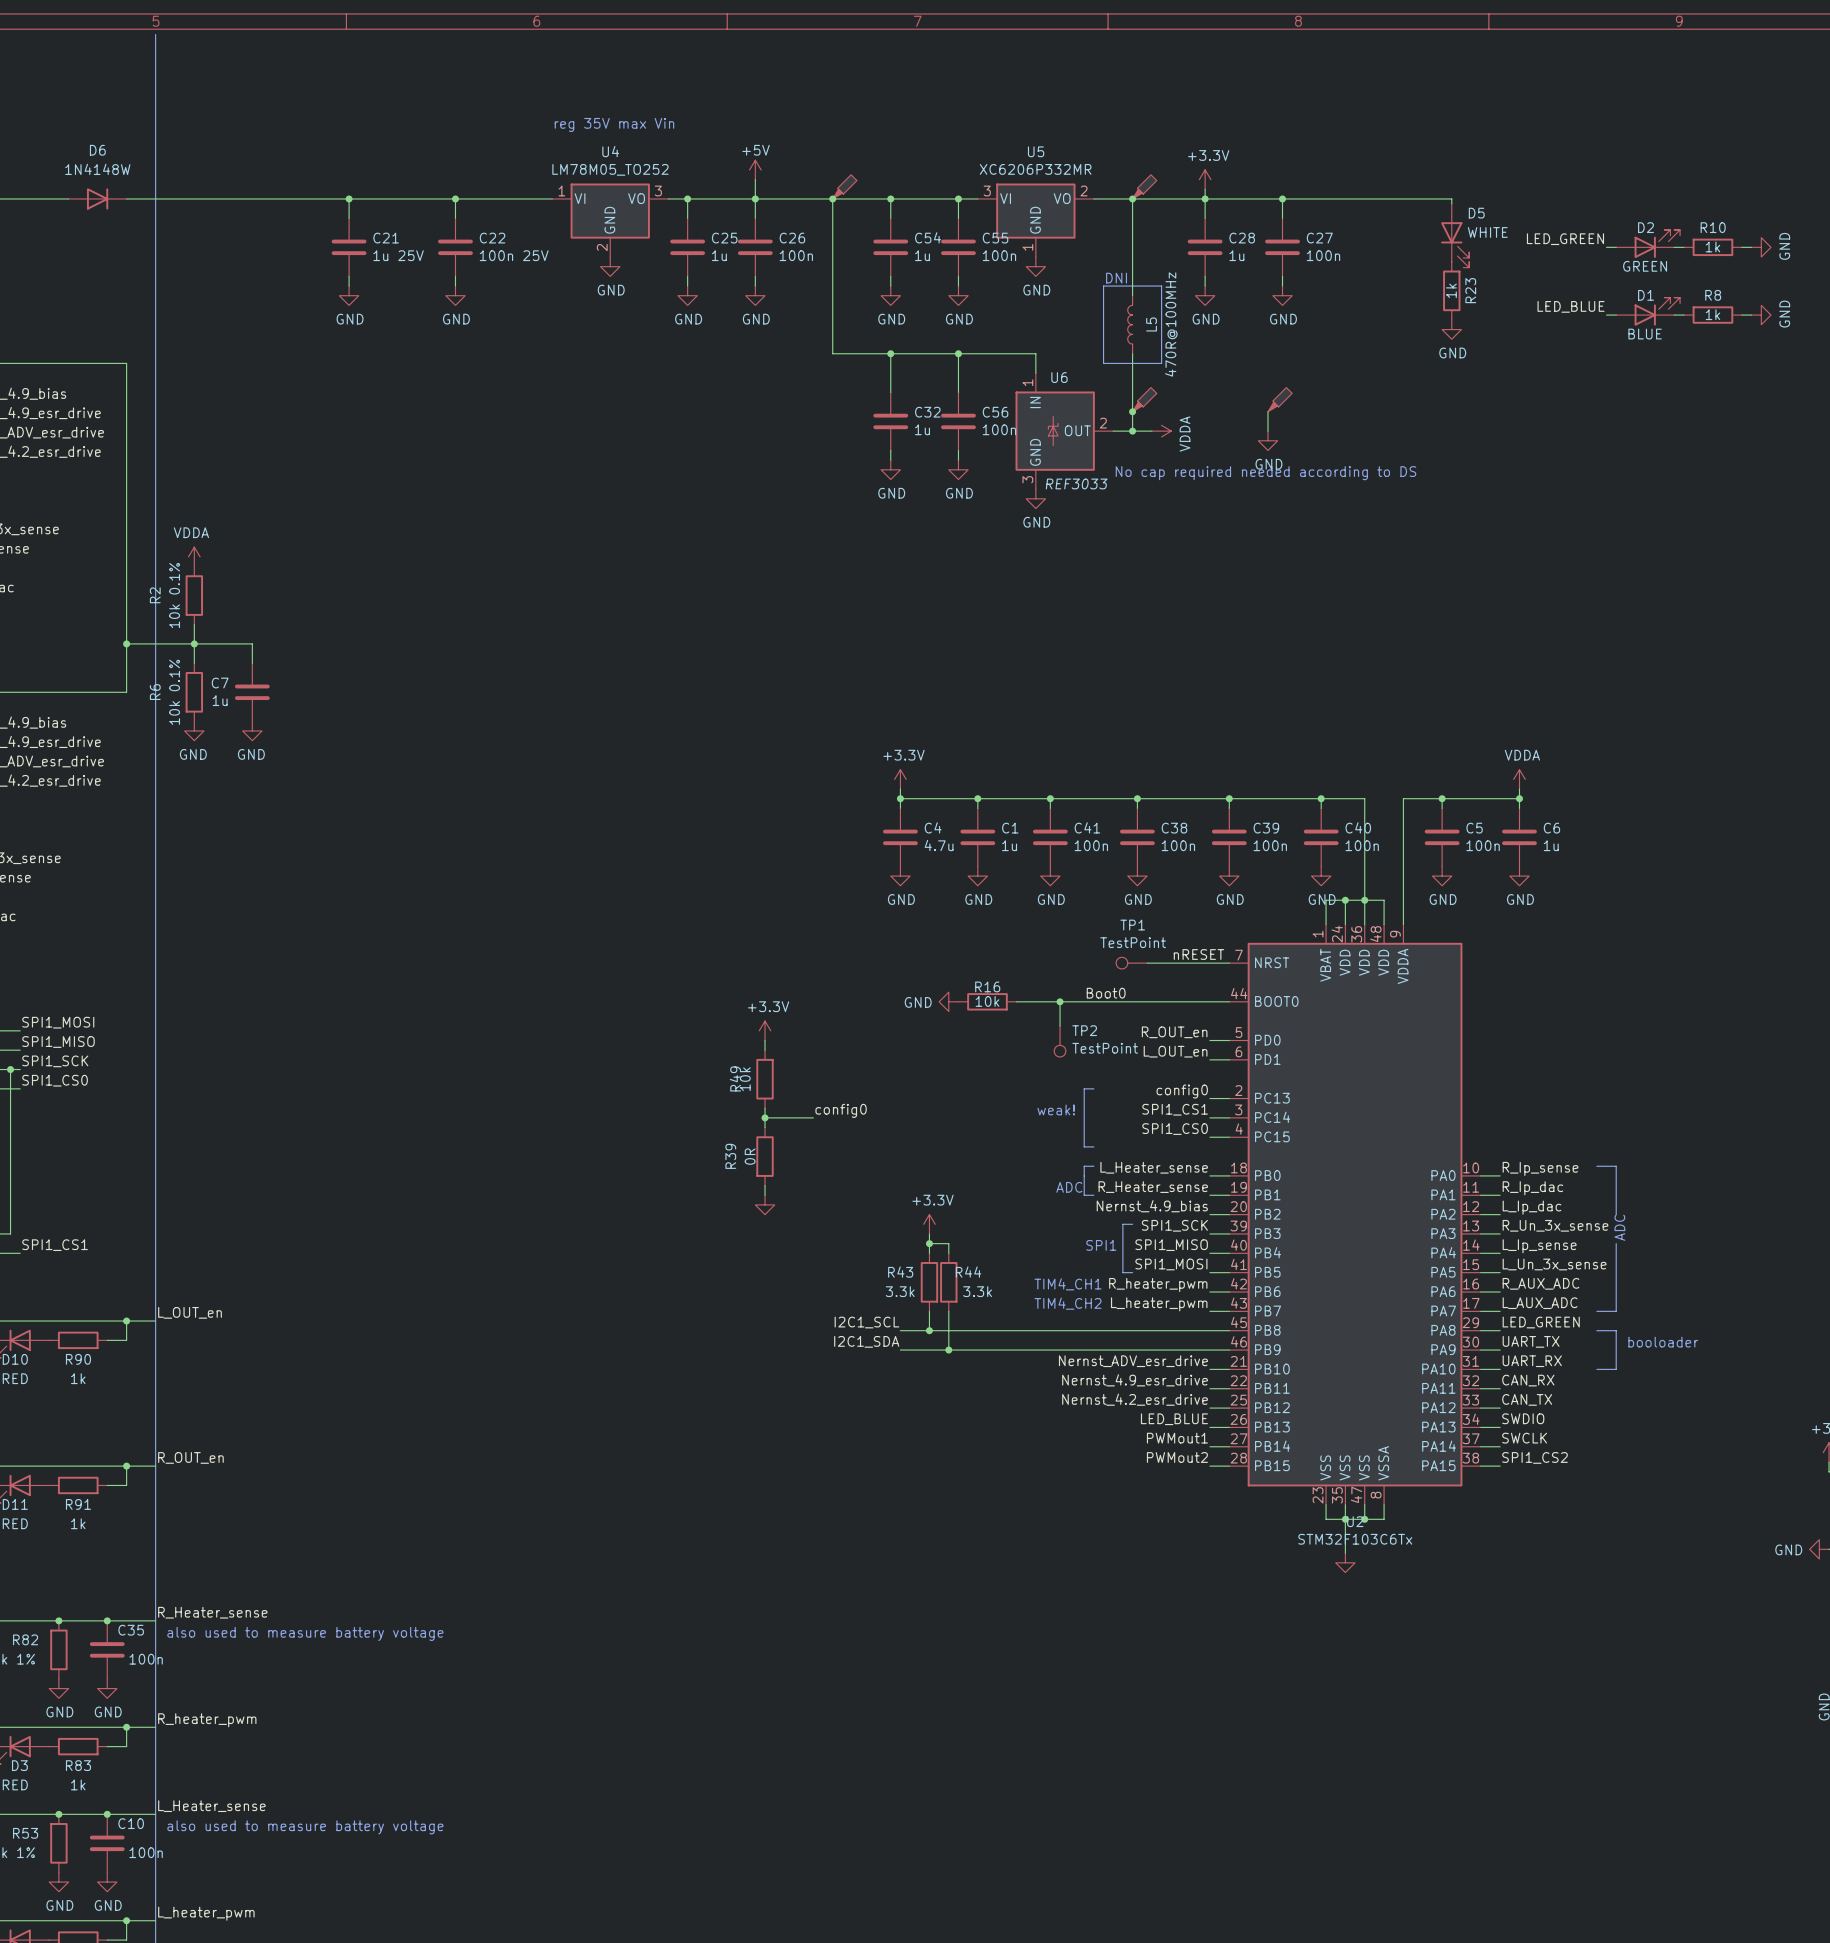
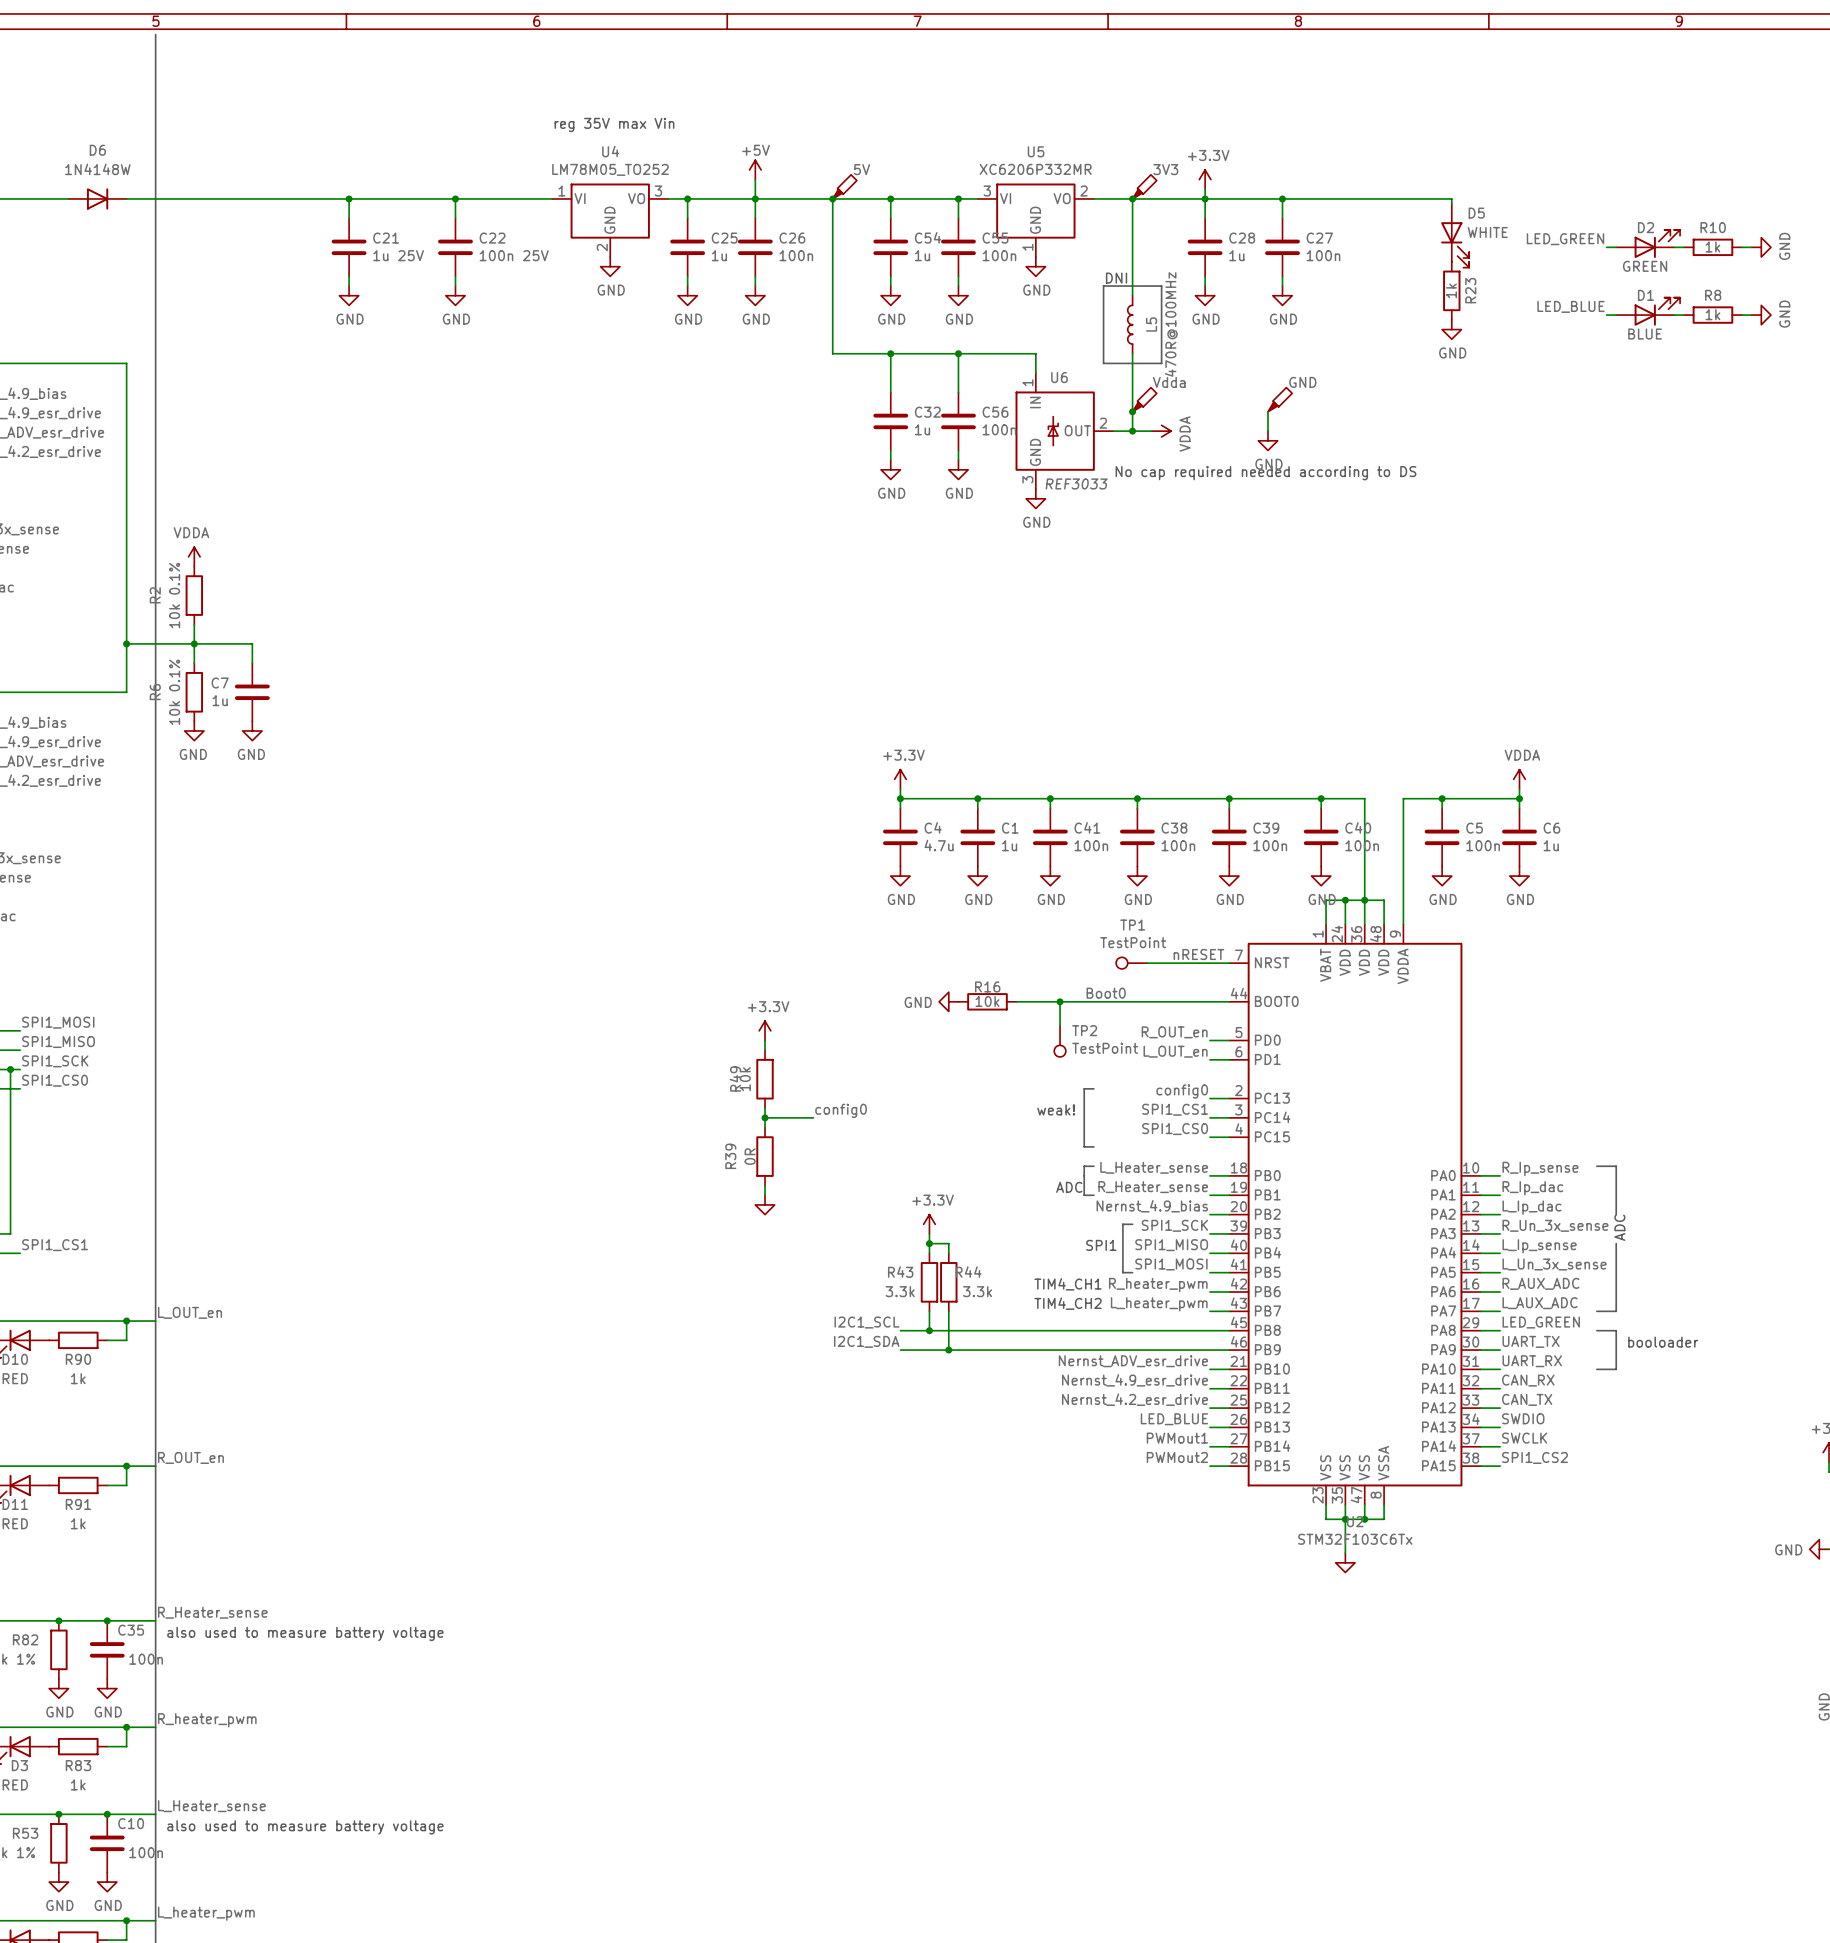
part value: none -> 5V (862, 169)
part value: none -> 3V3 (1165, 169)
part value: none -> Vdda (1169, 382)
part value: none -> GND (1302, 382)

